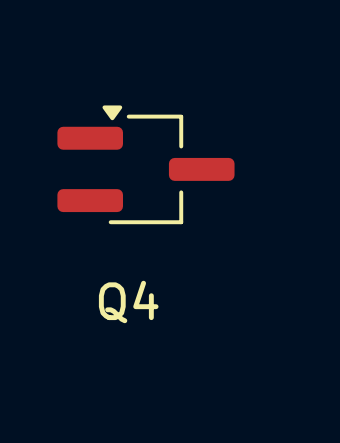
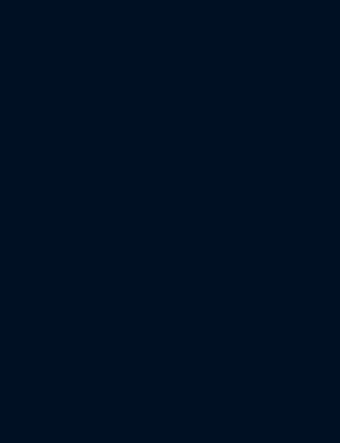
Q4: (145, 164) -> none

